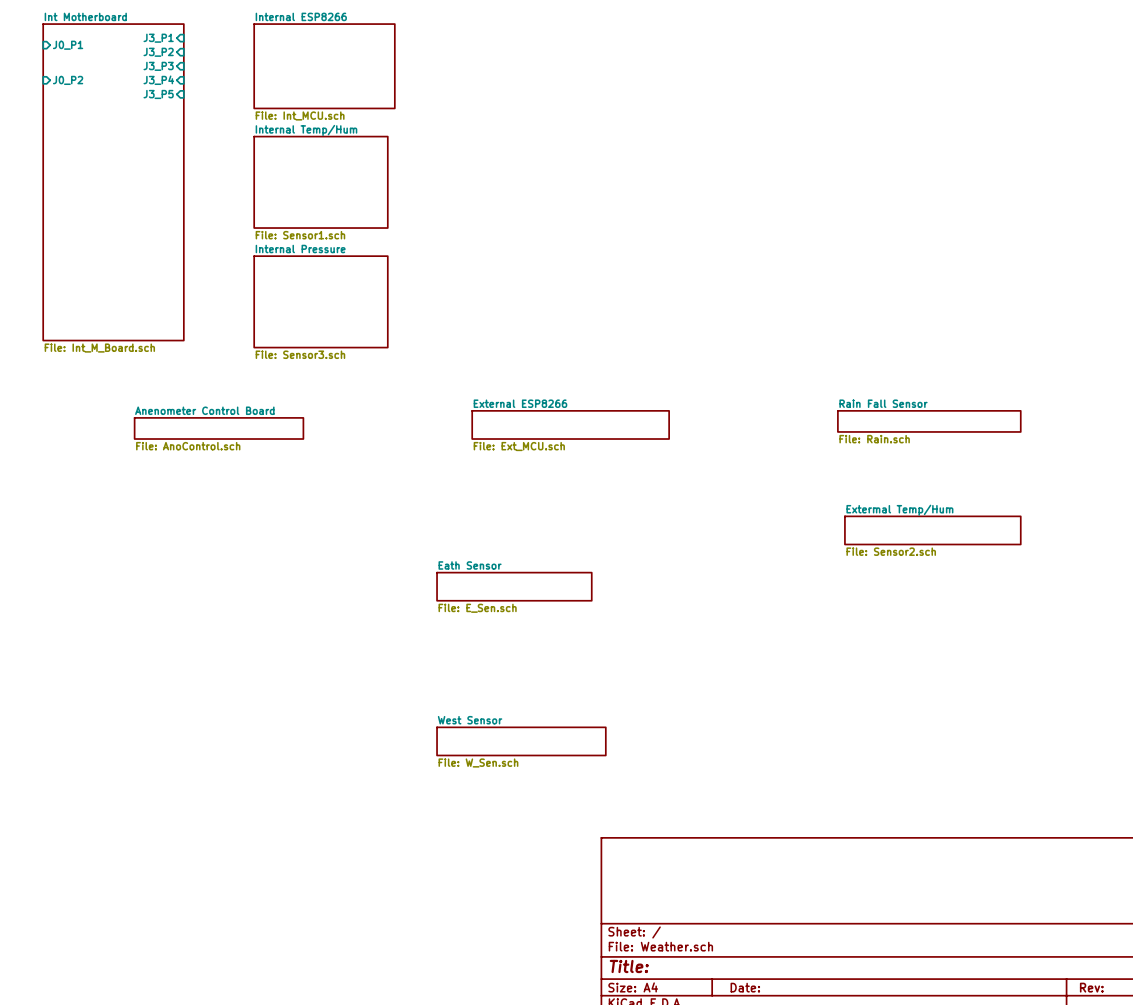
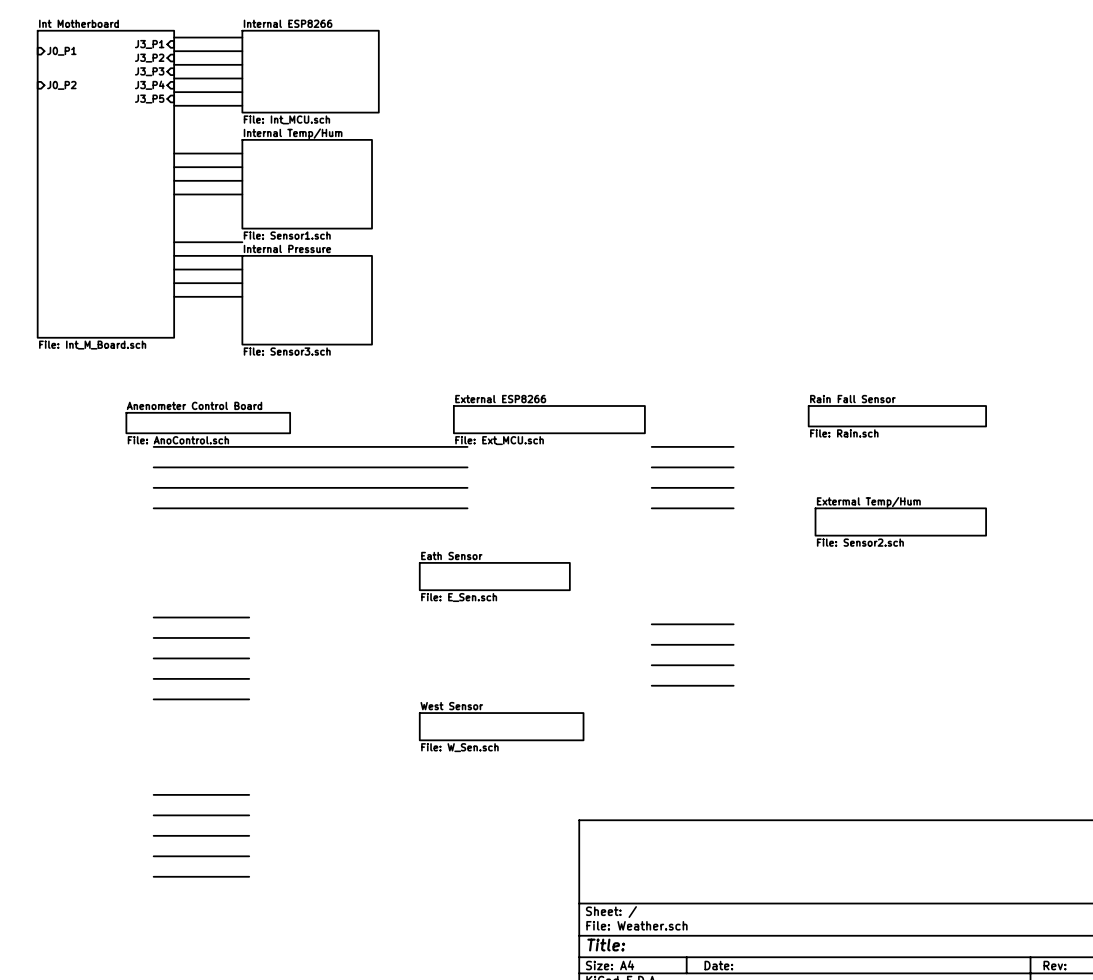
wire: none -> (174, 37) (242, 37)
wire: none -> (174, 51) (242, 51)
wire: none -> (174, 64) (242, 64)
wire: none -> (174, 78) (242, 78)
wire: none -> (174, 92) (242, 92)
wire: none -> (174, 105) (242, 105)
wire: none -> (174, 153) (242, 153)
wire: none -> (174, 167) (242, 167)
wire: none -> (174, 180) (242, 180)
wire: none -> (174, 194) (242, 194)
wire: none -> (174, 242) (242, 242)
wire: none -> (174, 255) (242, 255)
wire: none -> (174, 269) (242, 269)
wire: none -> (174, 283) (242, 283)
wire: none -> (174, 296) (242, 296)
wire: none -> (153, 446) (467, 446)
wire: none -> (651, 446) (733, 446)
wire: none -> (153, 467) (467, 467)
wire: none -> (651, 467) (733, 467)
wire: none -> (153, 487) (467, 487)
wire: none -> (651, 487) (733, 487)
wire: none -> (153, 508) (467, 508)
wire: none -> (651, 508) (733, 508)
wire: none -> (153, 617) (249, 617)
wire: none -> (651, 624) (733, 624)
wire: none -> (153, 637) (249, 637)
wire: none -> (651, 644) (733, 644)
wire: none -> (153, 658) (249, 658)
wire: none -> (651, 665) (733, 665)
wire: none -> (153, 678) (249, 678)
wire: none -> (651, 685) (733, 685)
wire: none -> (153, 699) (249, 699)
wire: none -> (153, 794) (249, 794)
wire: none -> (153, 815) (249, 815)
wire: none -> (153, 835) (249, 835)
wire: none -> (153, 856) (249, 856)
wire: none -> (153, 876) (249, 876)

